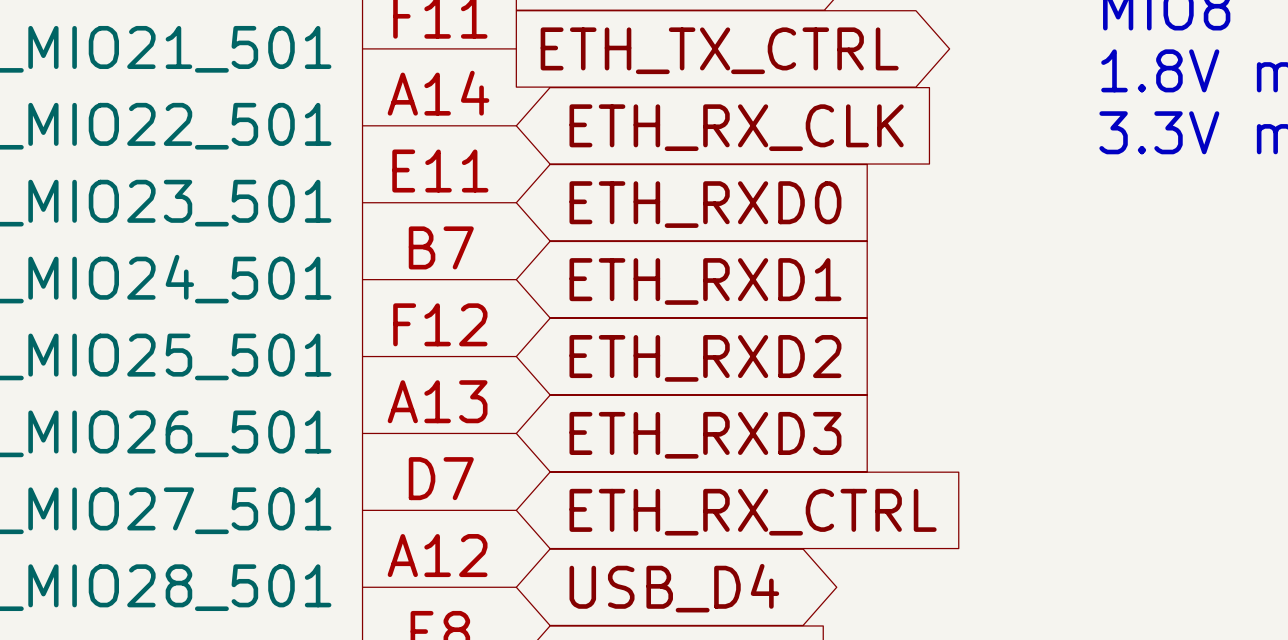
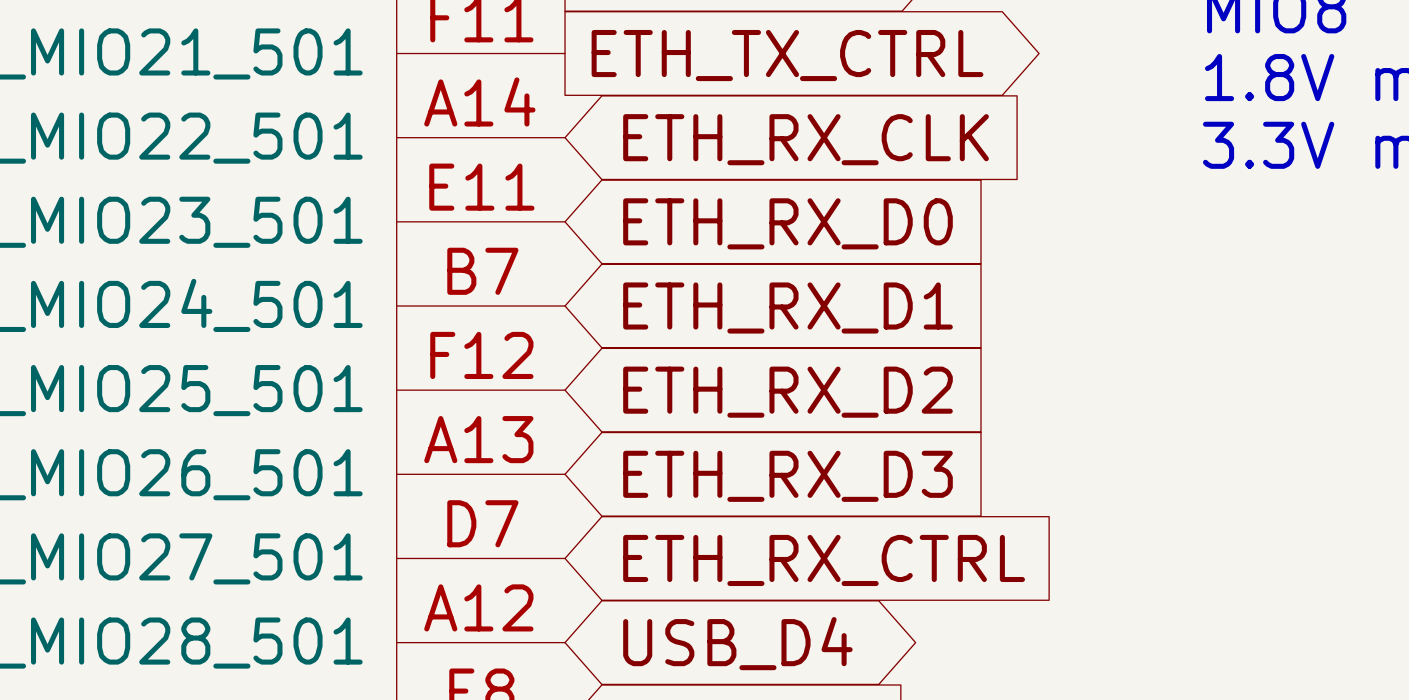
global label: ETH_RXD0 (705, 204) -> ETH_RX_D0 (787, 223)
global label: ETH_RXD1 (705, 281) -> ETH_RX_D1 (787, 308)
global label: ETH_RXD2 (705, 358) -> ETH_RX_D2 (787, 392)
global label: ETH_RXD3 (705, 435) -> ETH_RX_D3 (787, 476)

